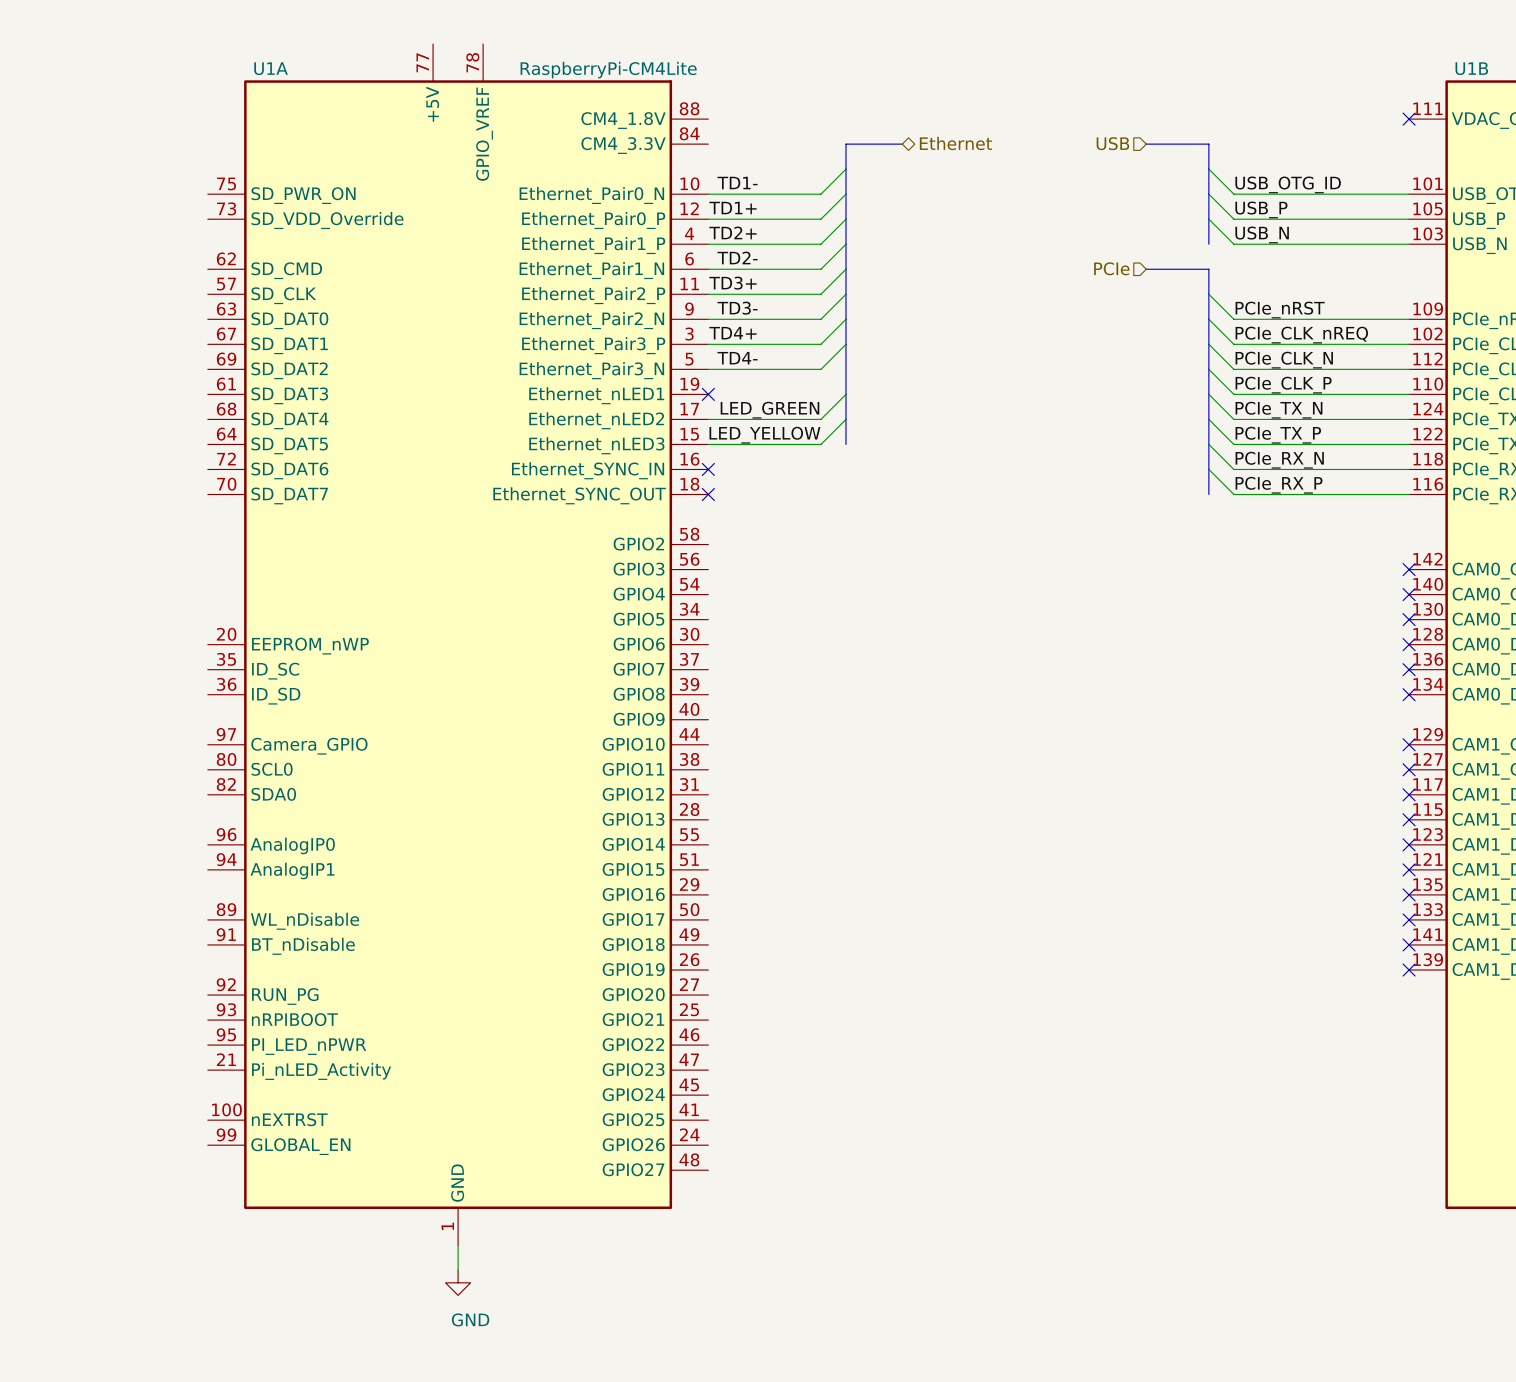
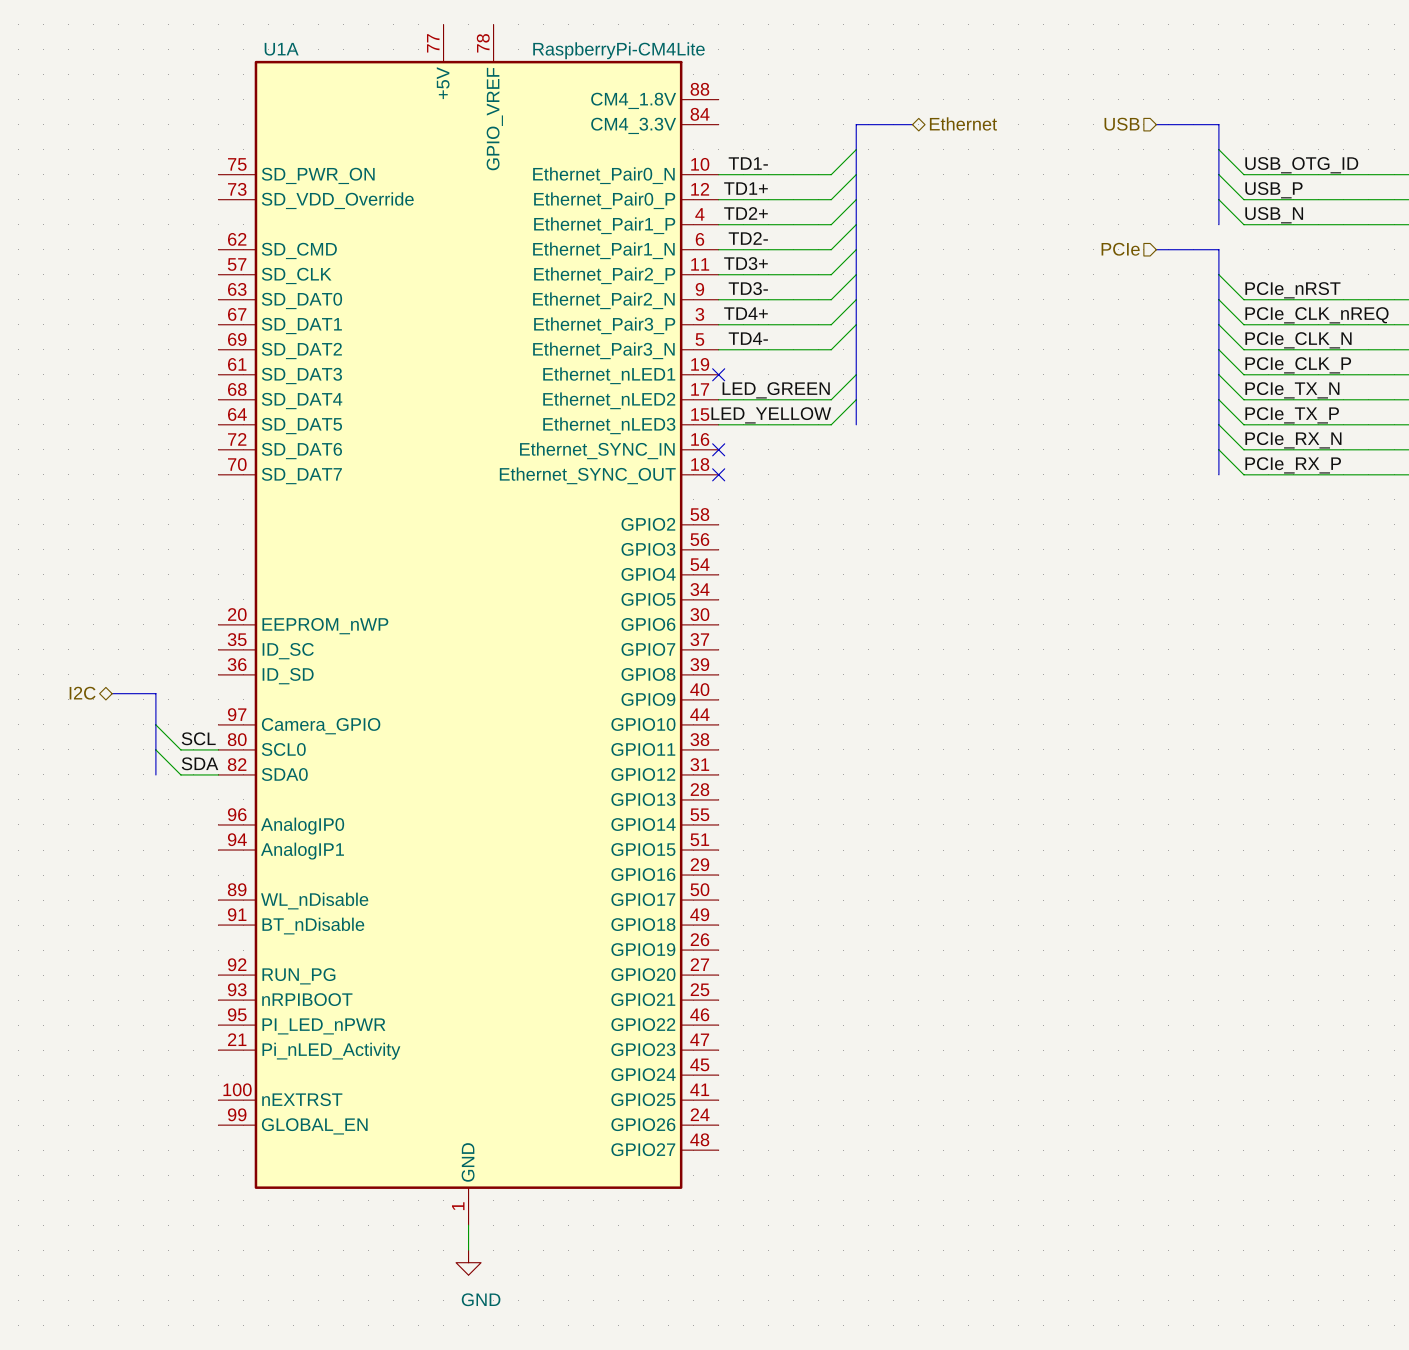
hierarchical label: none -> I2C (82, 693)
bus: none -> (112, 693) (155, 693) (155, 774)
wire: none -> (155, 724) (180, 749) (218, 749)
label: none -> SCL (198, 738)
wire: none -> (155, 749) (180, 774) (218, 774)
label: none -> SDA (200, 763)

